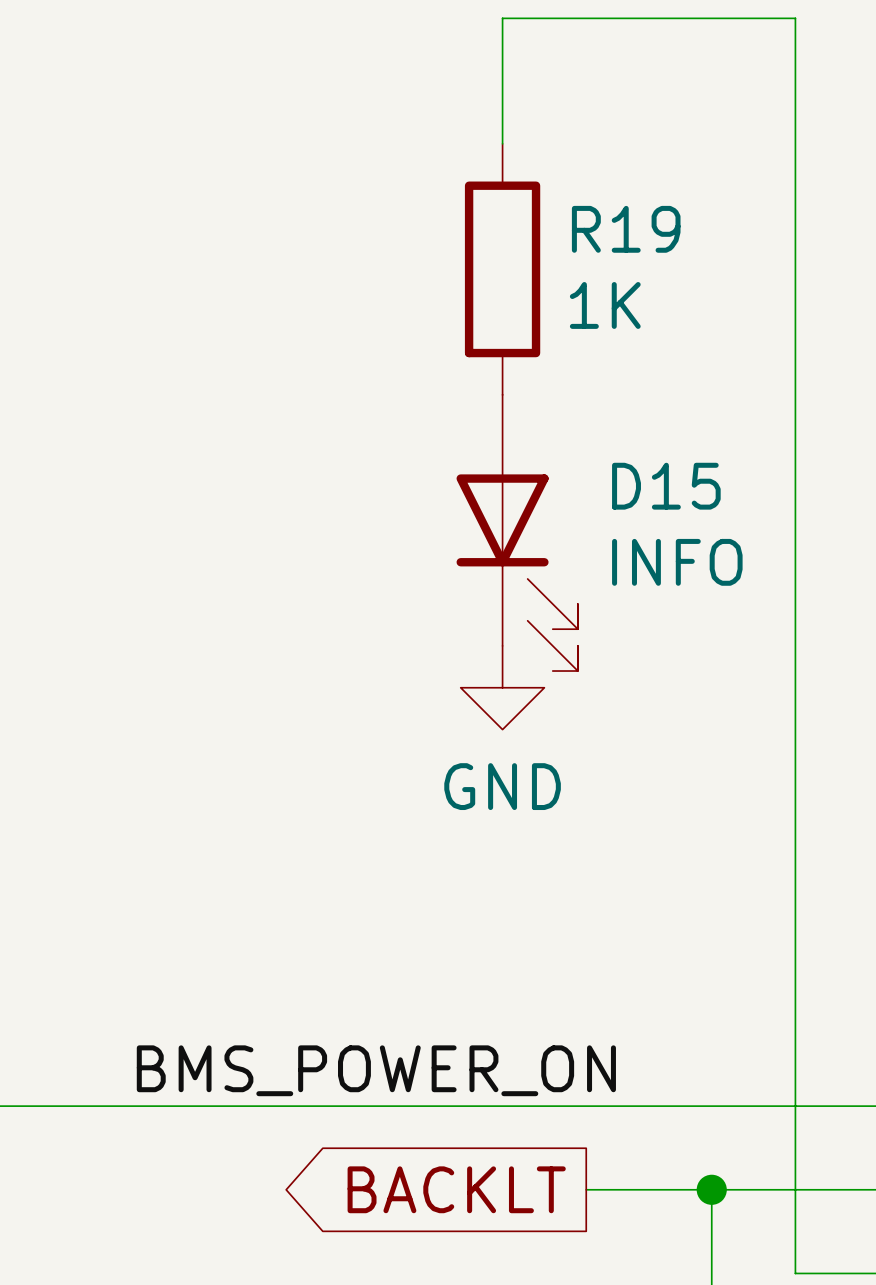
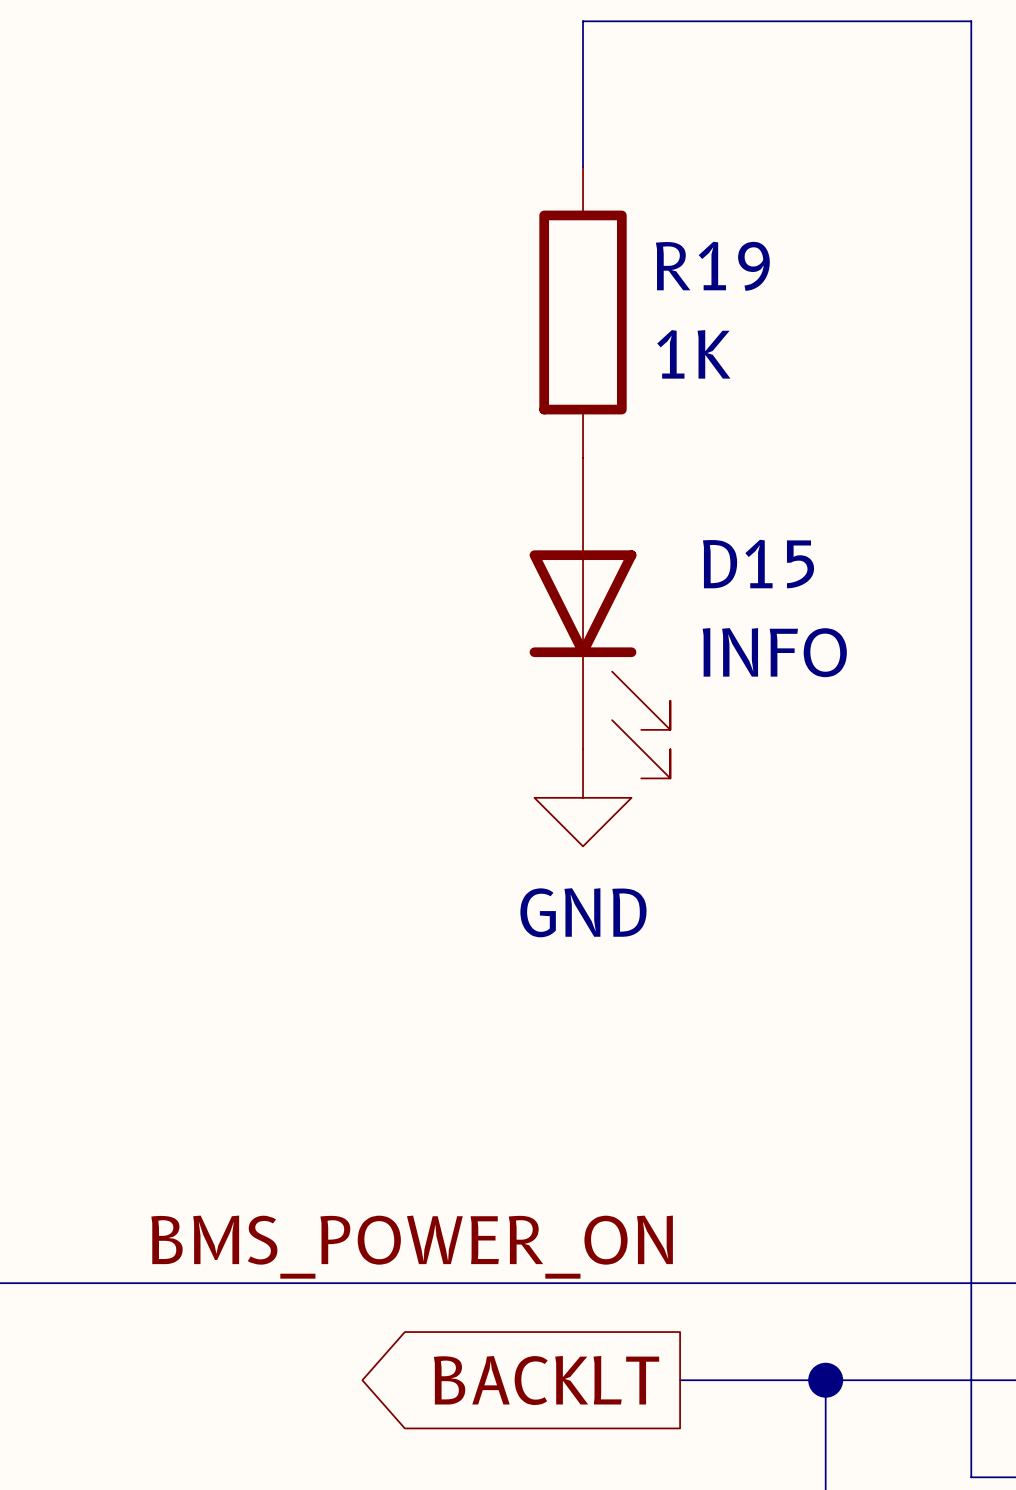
wire: (795, 18) (795, 1273) (837, 1273) -> (922, 21) (971, 21) (971, 1477)

